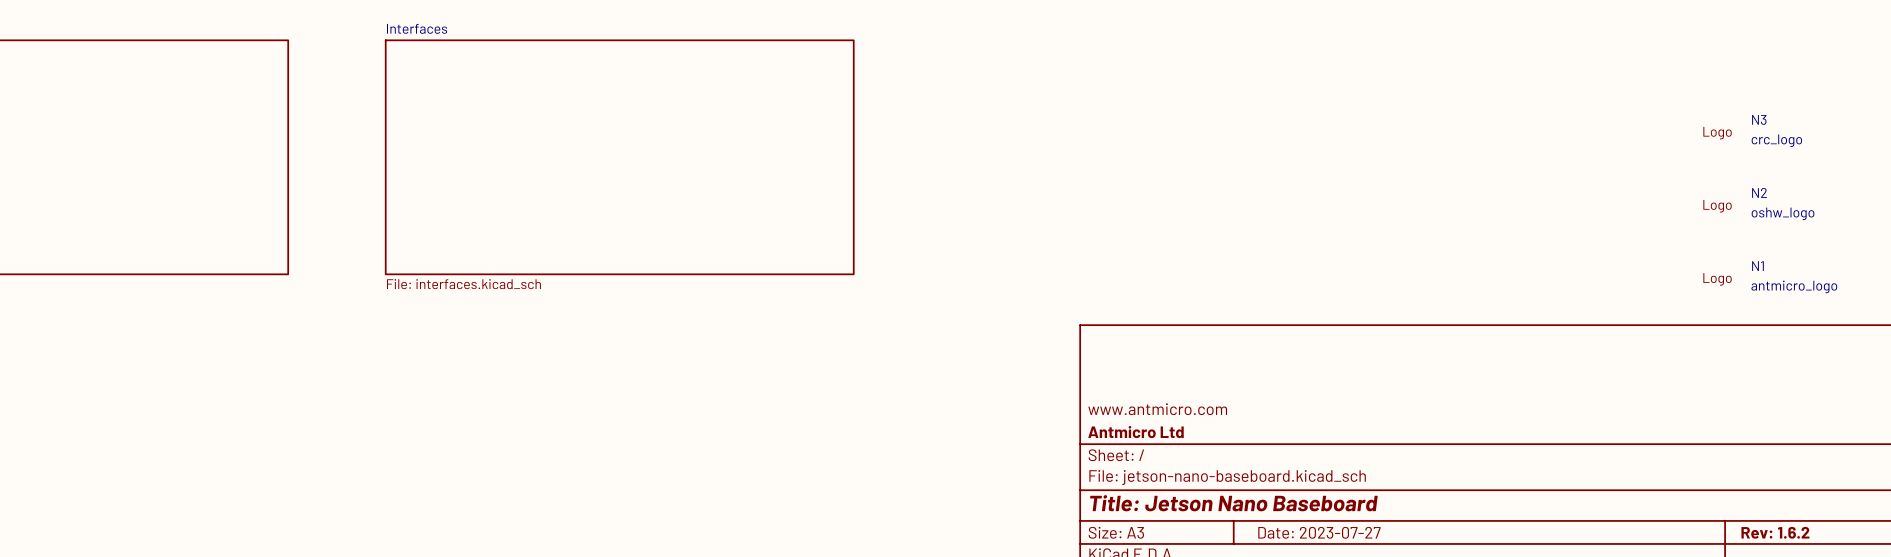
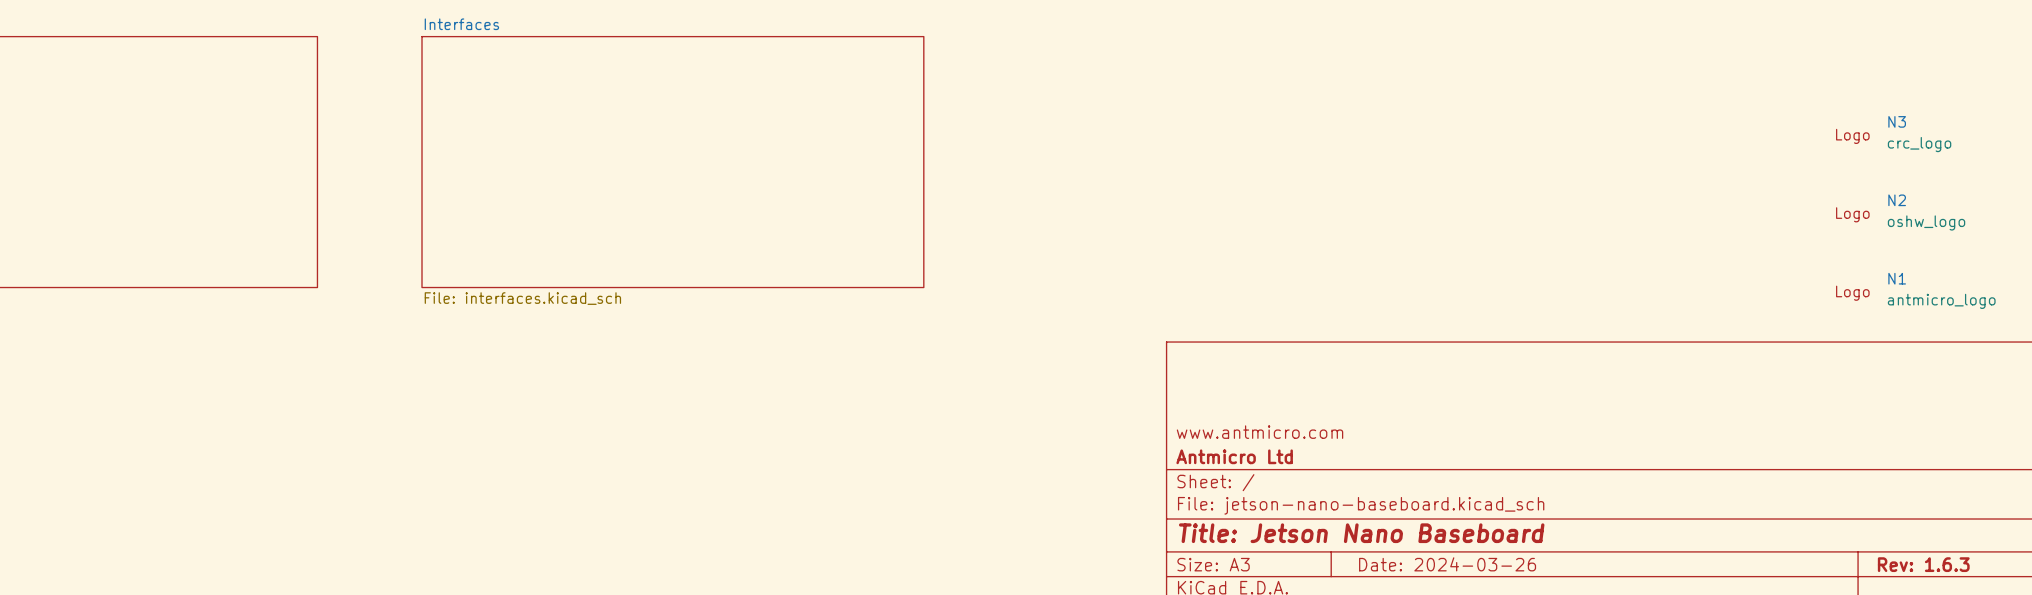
title block: Date: 2023-07-27 (1319, 532) -> Date: 2024-03-26 (1447, 564)
title block: Rev: 1.6.2 (1775, 532) -> Rev: 1.6.3 (1923, 564)

